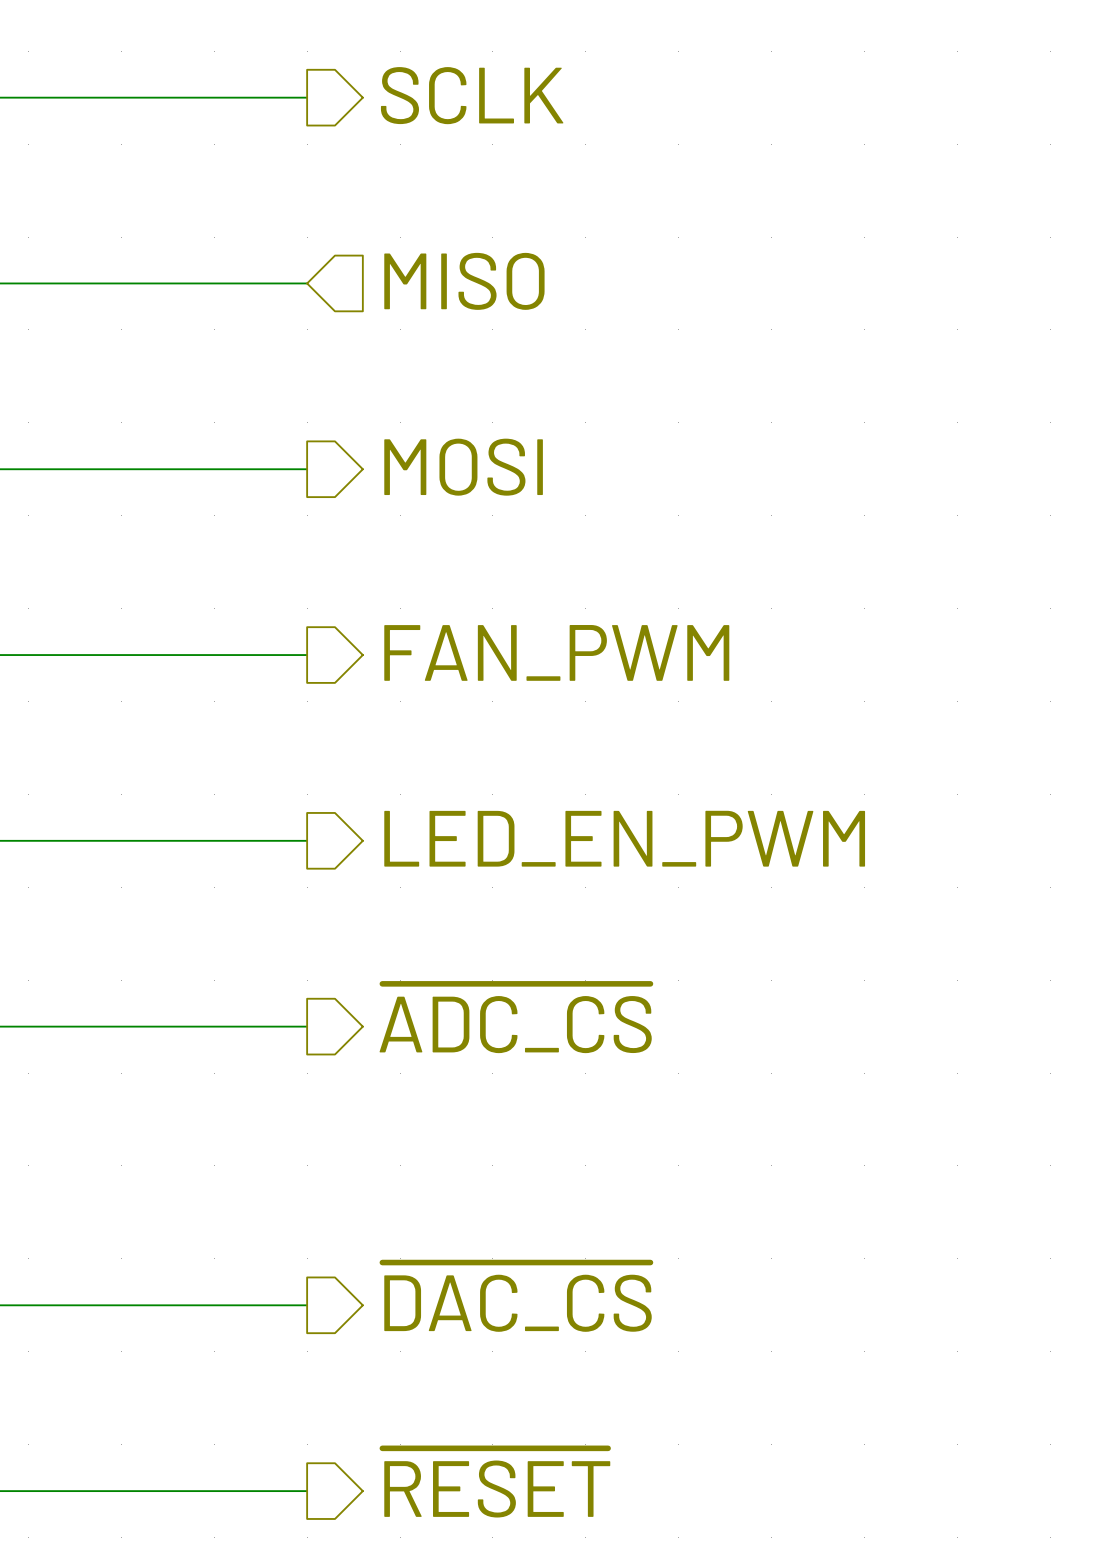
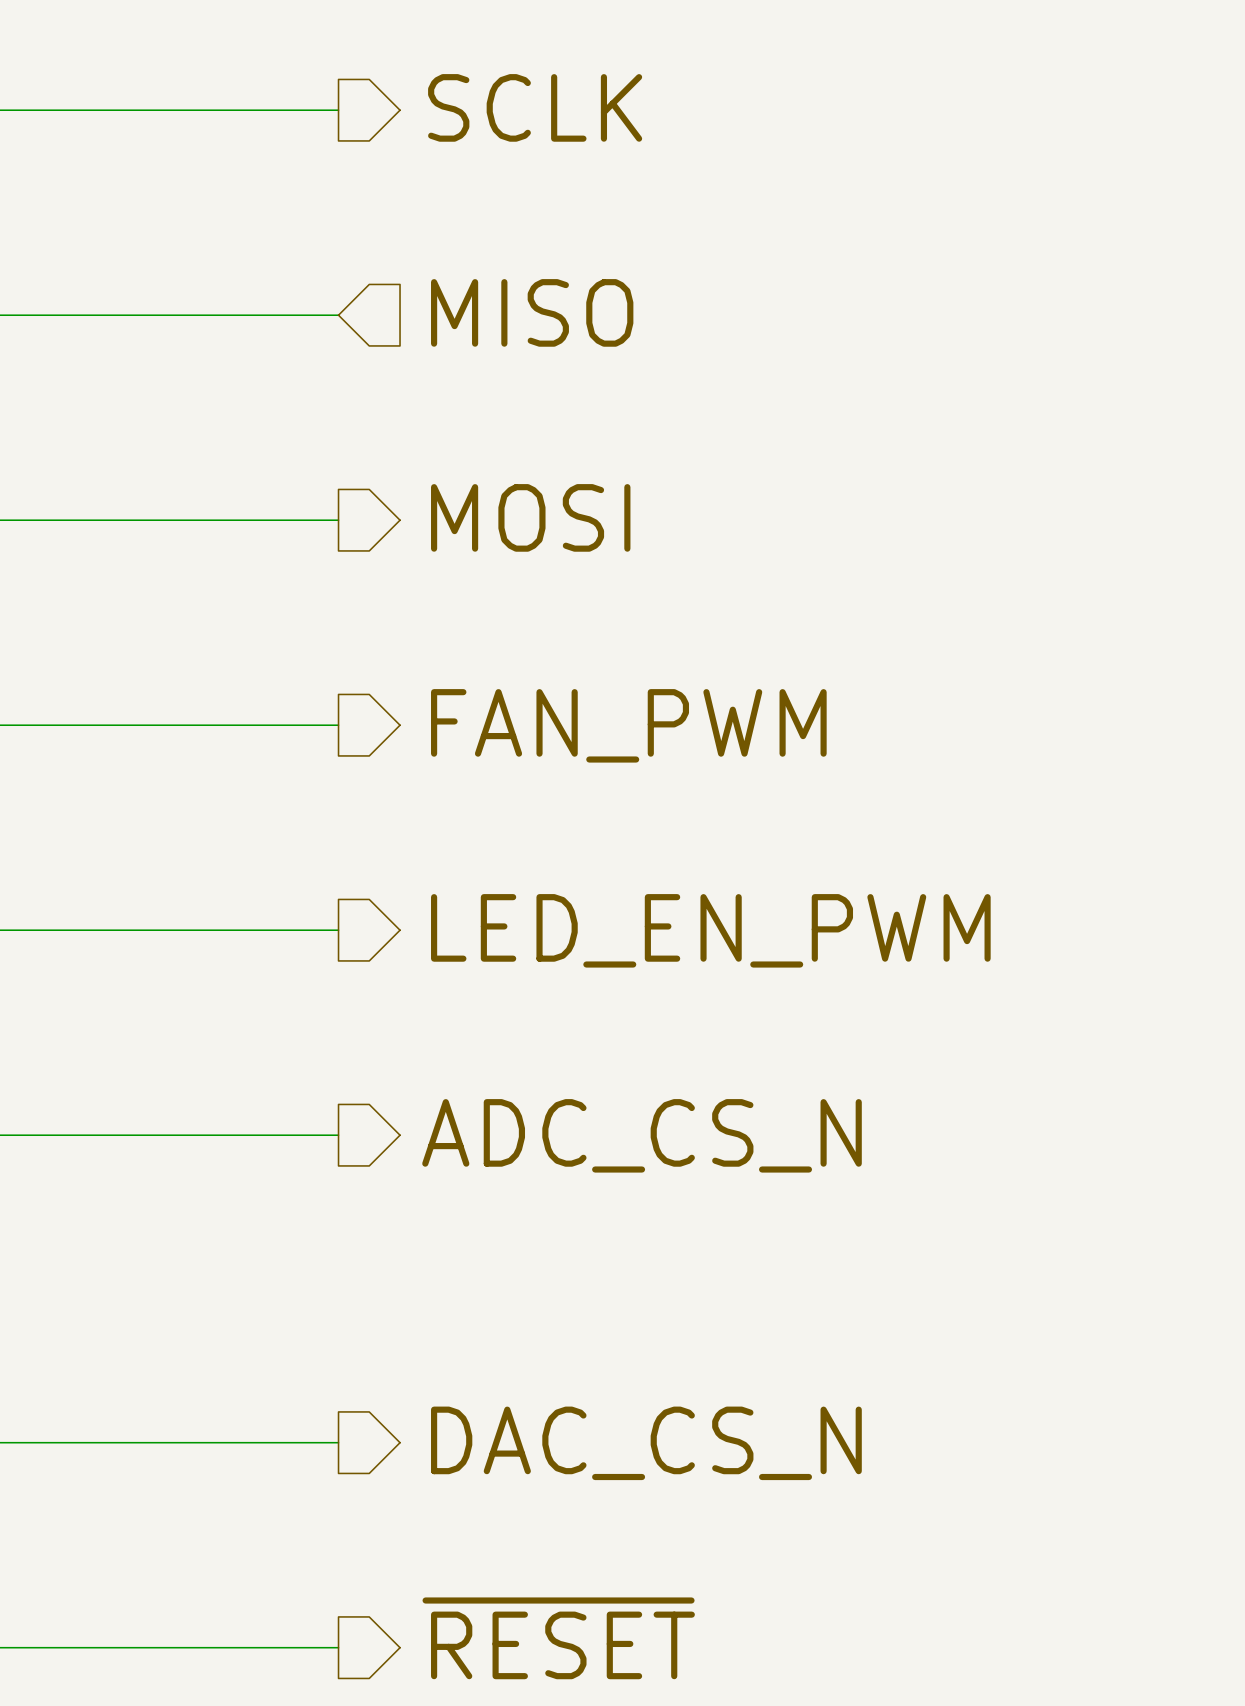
hierarchical label: ~{ADC_CS} (515, 1018) -> ADC_CS_N (642, 1135)
hierarchical label: ~{DAC_CS} (517, 1297) -> DAC_CS_N (646, 1443)

